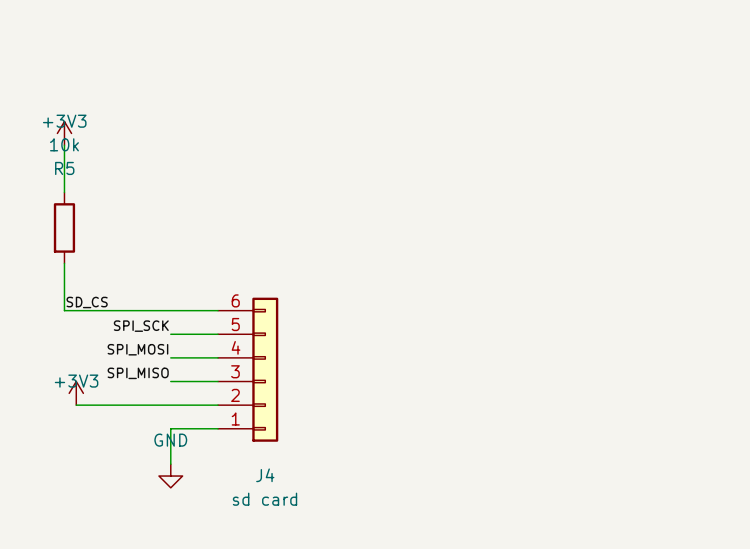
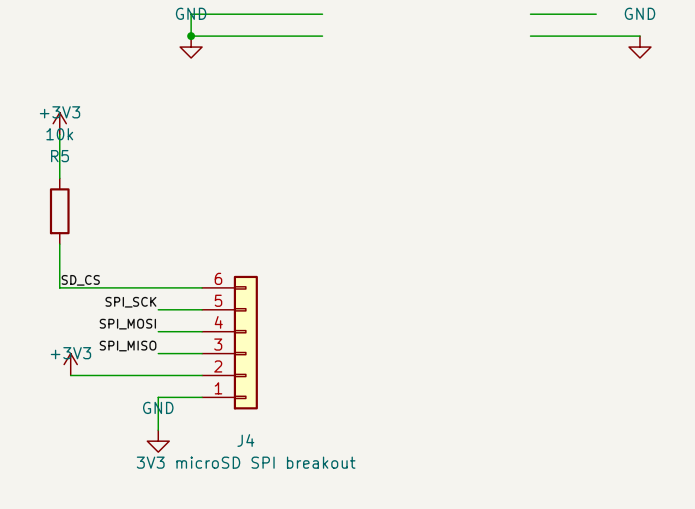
wire: none -> (322, 14) (191, 14) (191, 36) (322, 36)
wire: none -> (530, 14) (596, 14)
junction: none -> (191, 36)
wire: none -> (530, 36) (639, 36)
power symbol: none -> GND (191, 47)
power symbol: none -> GND (639, 47)
J4 value: sd card (265, 499) -> 3V3 microSD SPI breakout (246, 462)

